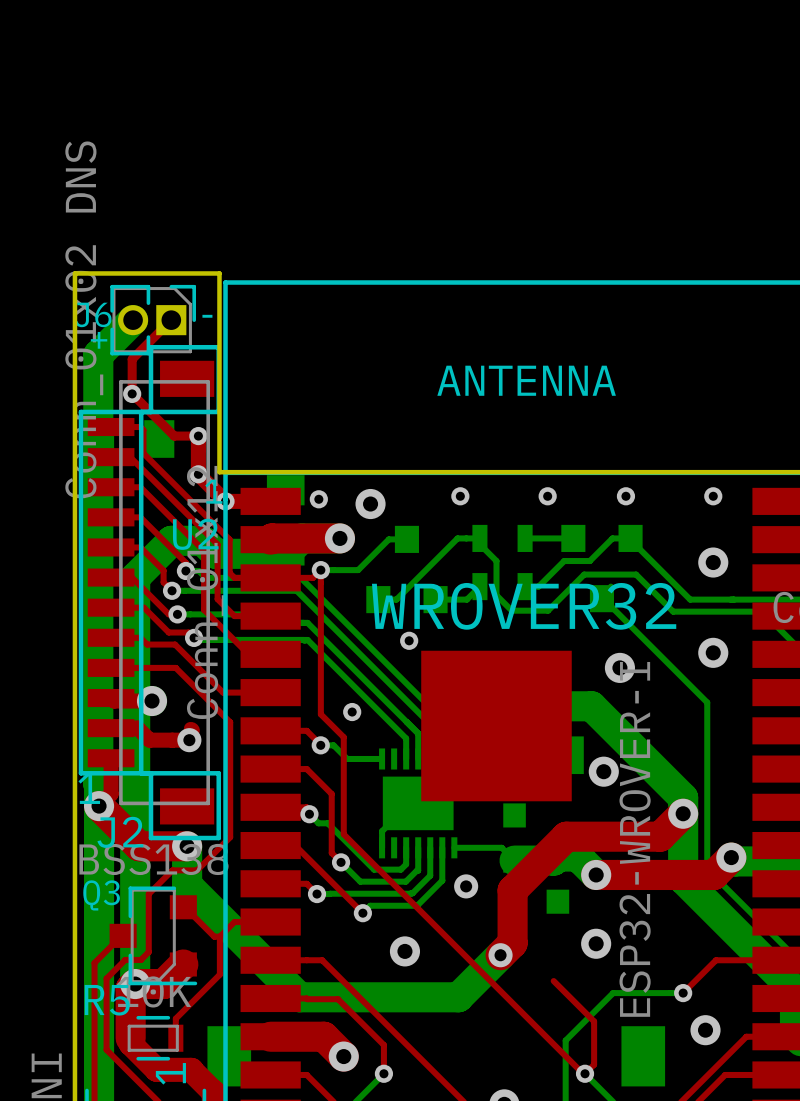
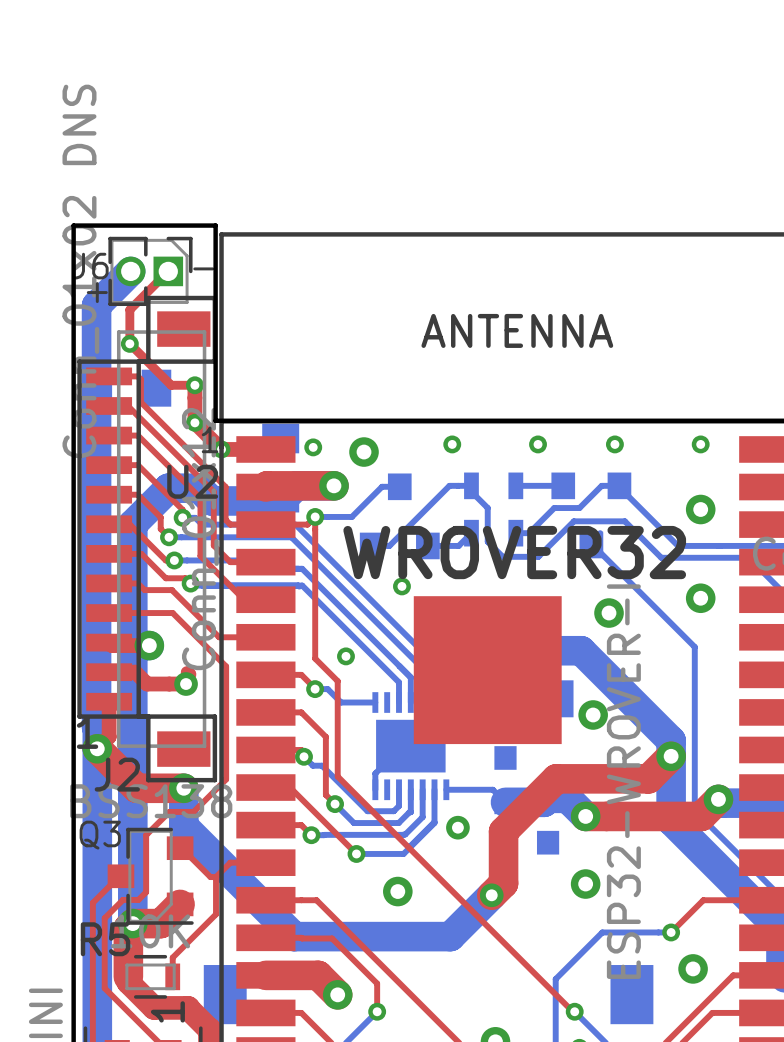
bottom track: (415, 905) (370, 905) (362, 913) -> (434, 822) (403, 853) (356, 853)
top track: (553, 981) (594, 1021) (594, 1064) (585, 1073) -> none

